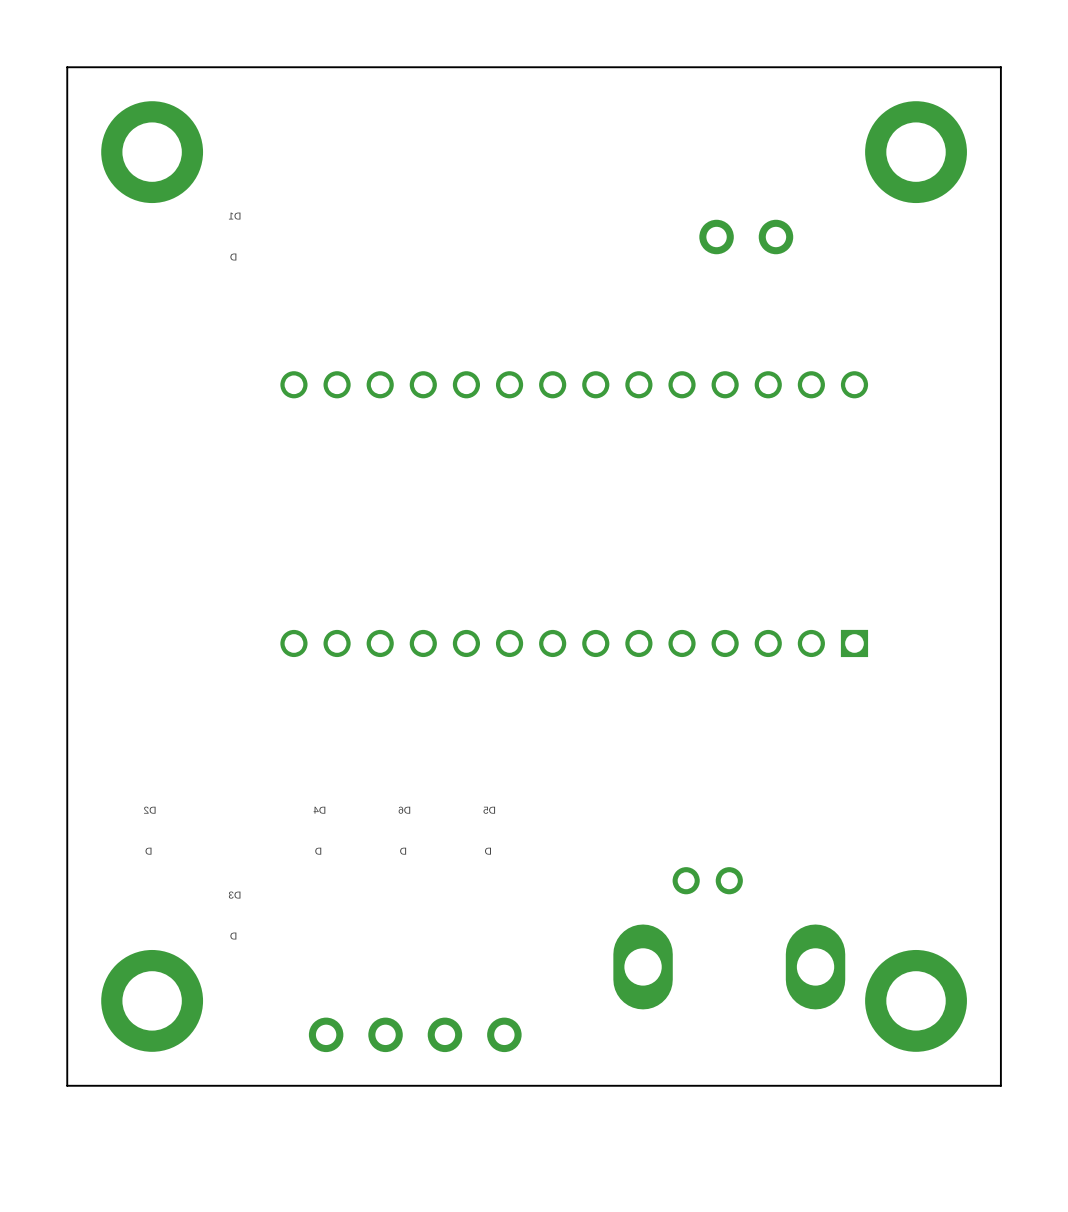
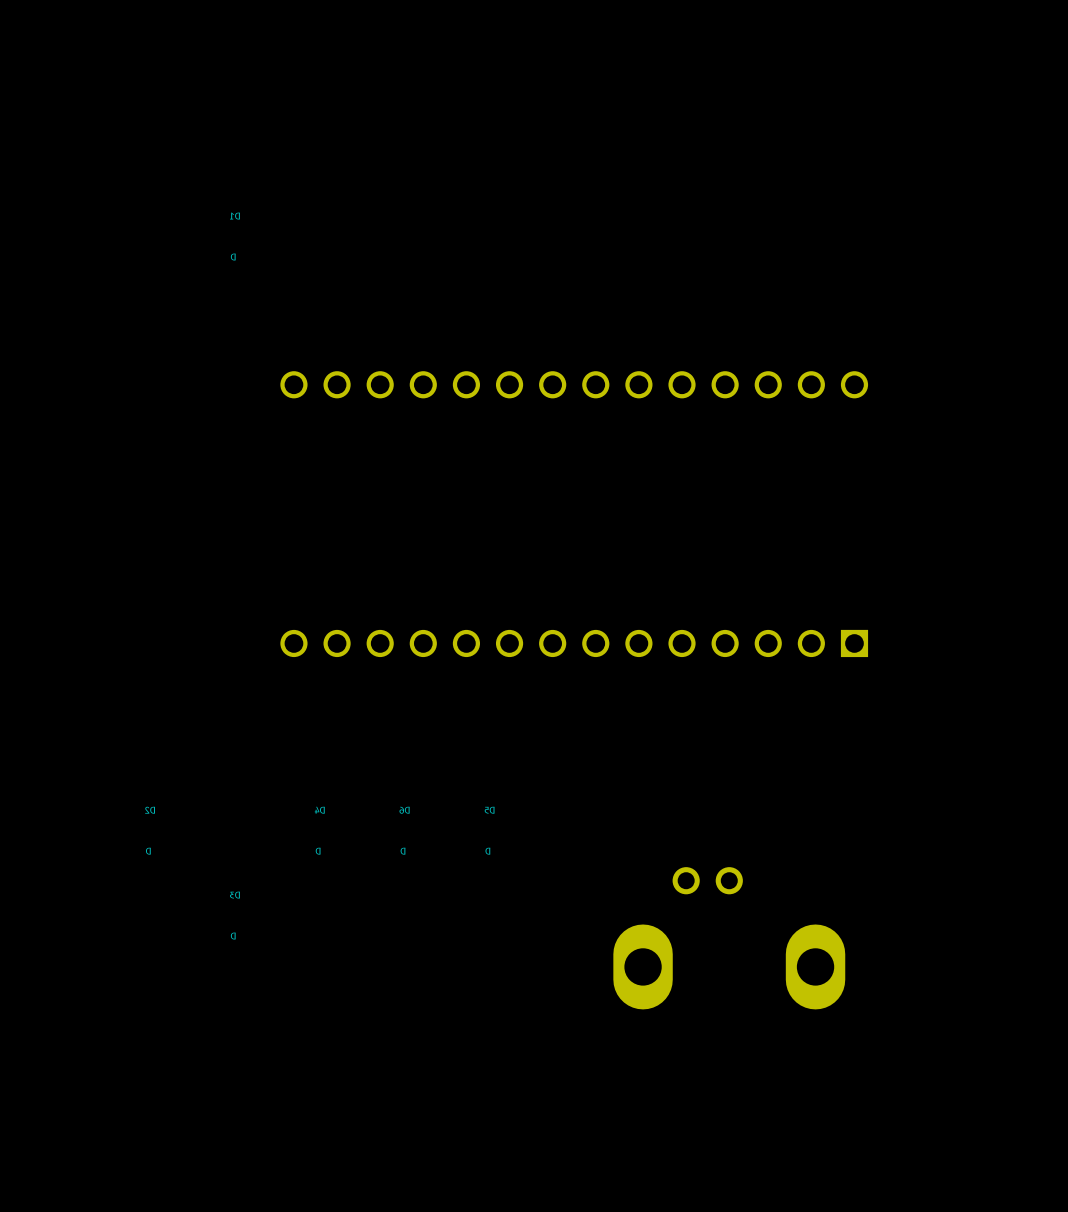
board edge: (1000, 67) (1000, 1085) (67, 1085) (67, 67) (1000, 67) -> none
part: (152, 152) -> none
part: (916, 152) -> none
part: (746, 237) -> none
part: (152, 1000) -> none
part: (916, 1000) -> none
part: (355, 1034) -> none
part: (474, 1034) -> none

